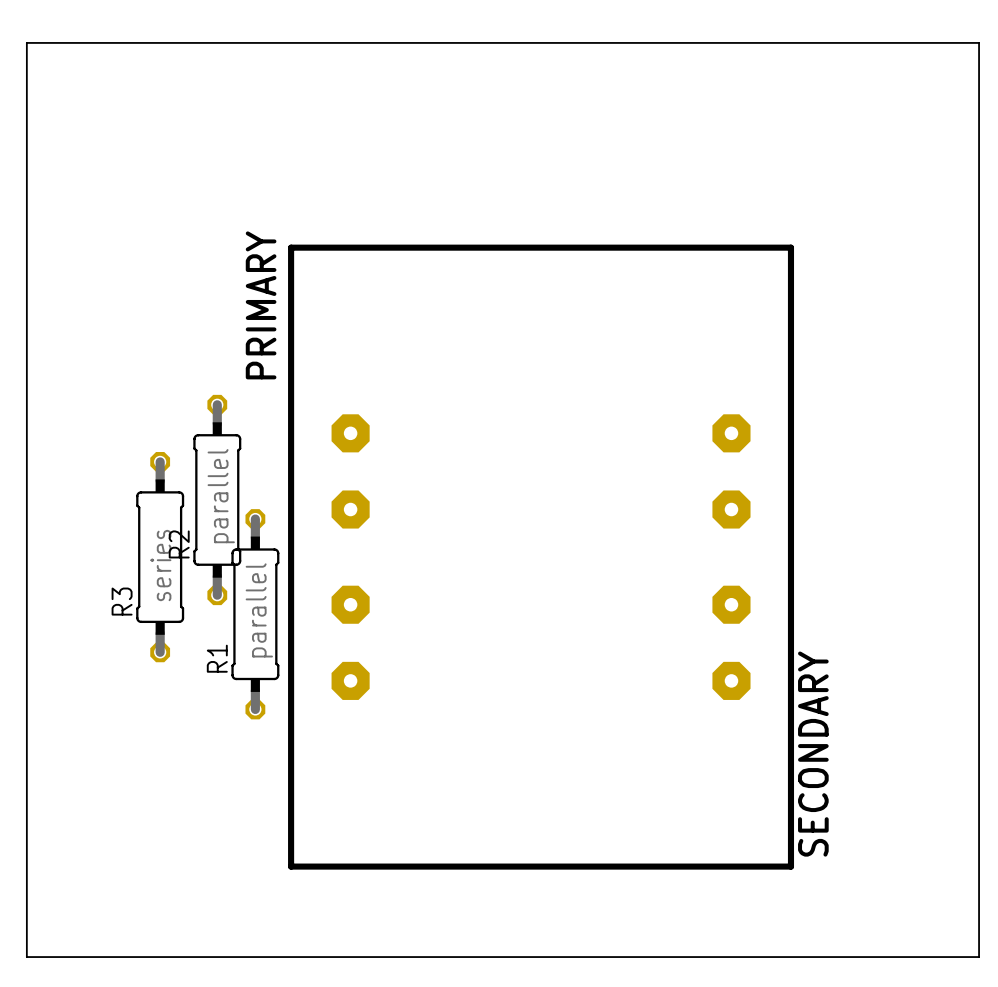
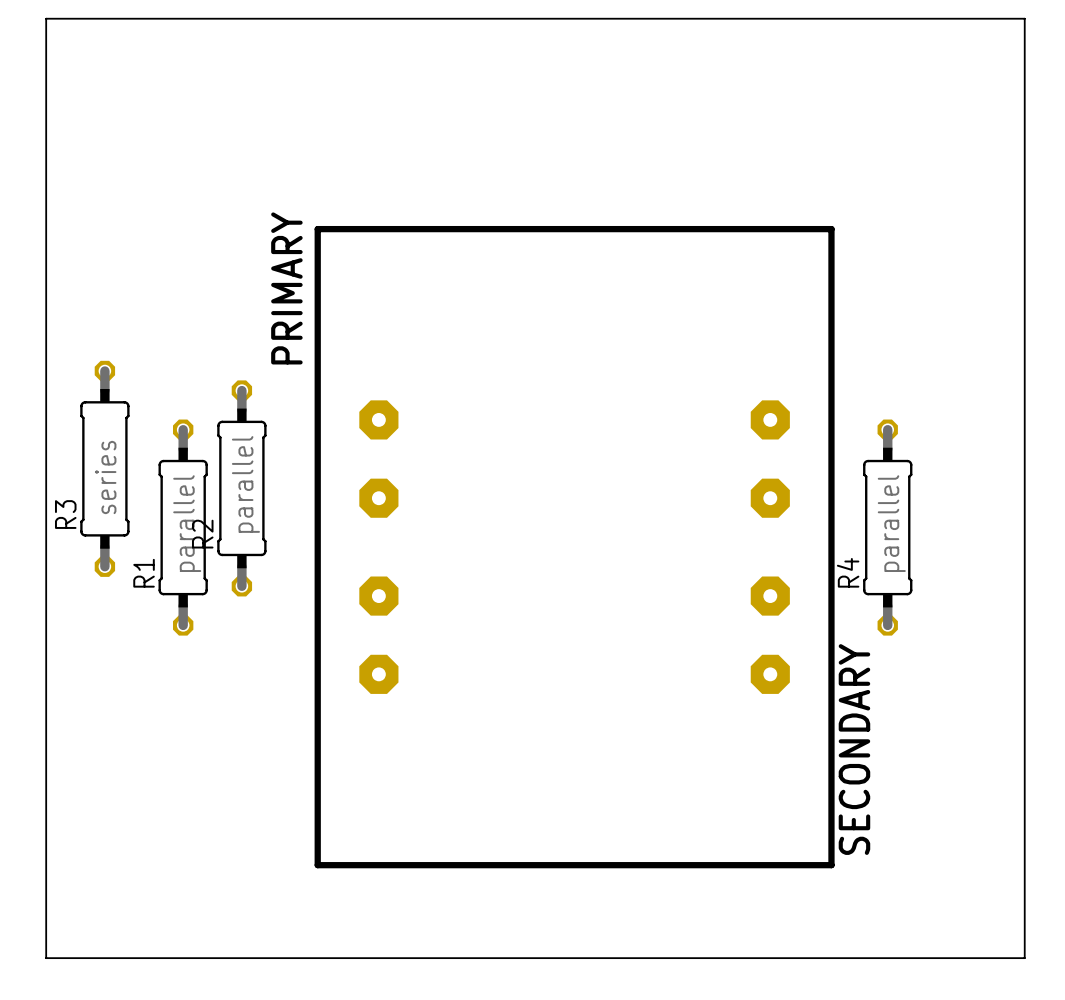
R4: none -> parallel (887, 527)
R3 position: (160, 557) -> (104, 468)
R1 position: (255, 614) -> (183, 527)

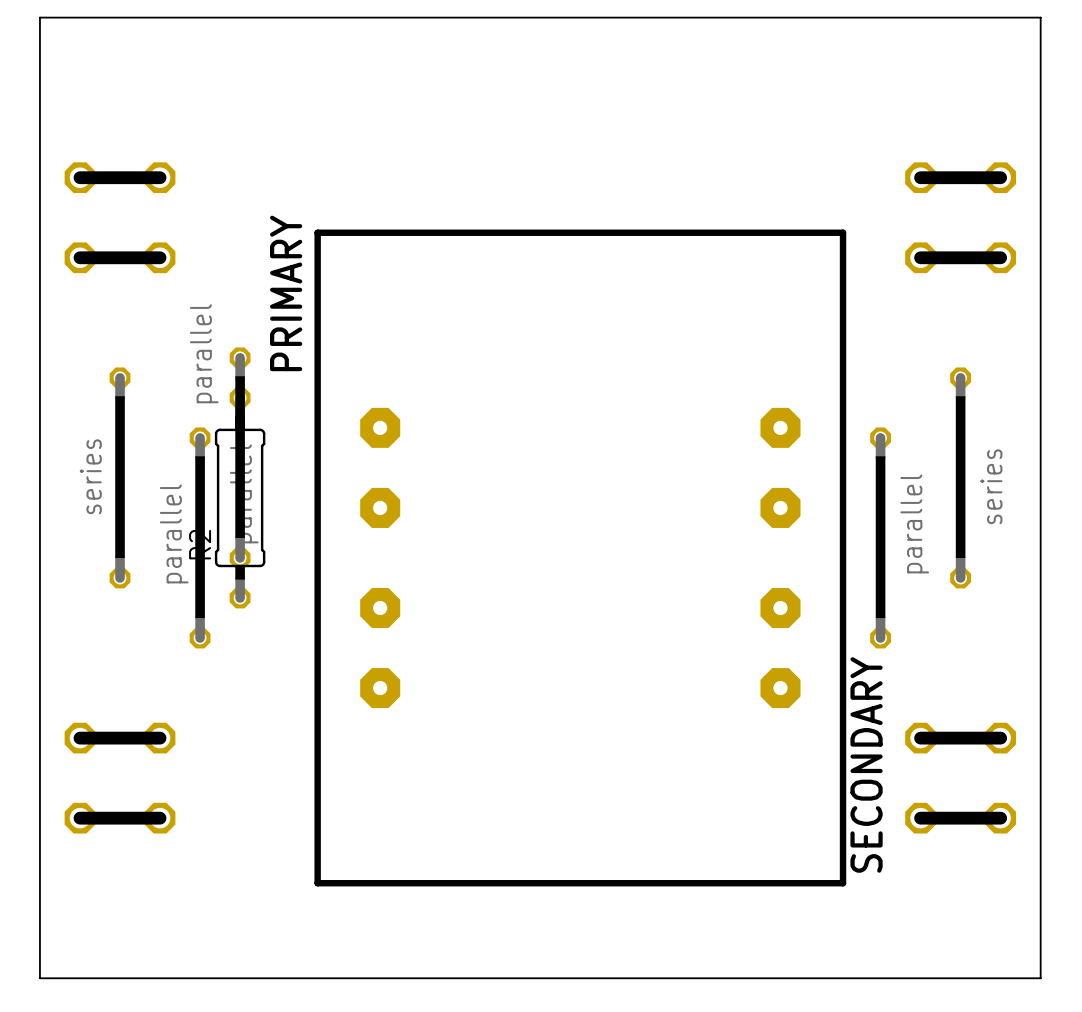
part: none -> (120, 177)
part: none -> (960, 177)
part: none -> (120, 257)
part: none -> (960, 257)
part: none -> parallel (240, 457)
R3: series (104, 468) -> none
part: none -> series (120, 477)
part: none -> series (960, 477)
R1: parallel (183, 527) -> none
part: none -> parallel (200, 537)
part: none -> parallel (880, 537)
R4: parallel (887, 527) -> none
part: none -> (120, 738)
part: none -> (960, 738)
part: none -> (120, 818)
part: none -> (960, 818)

